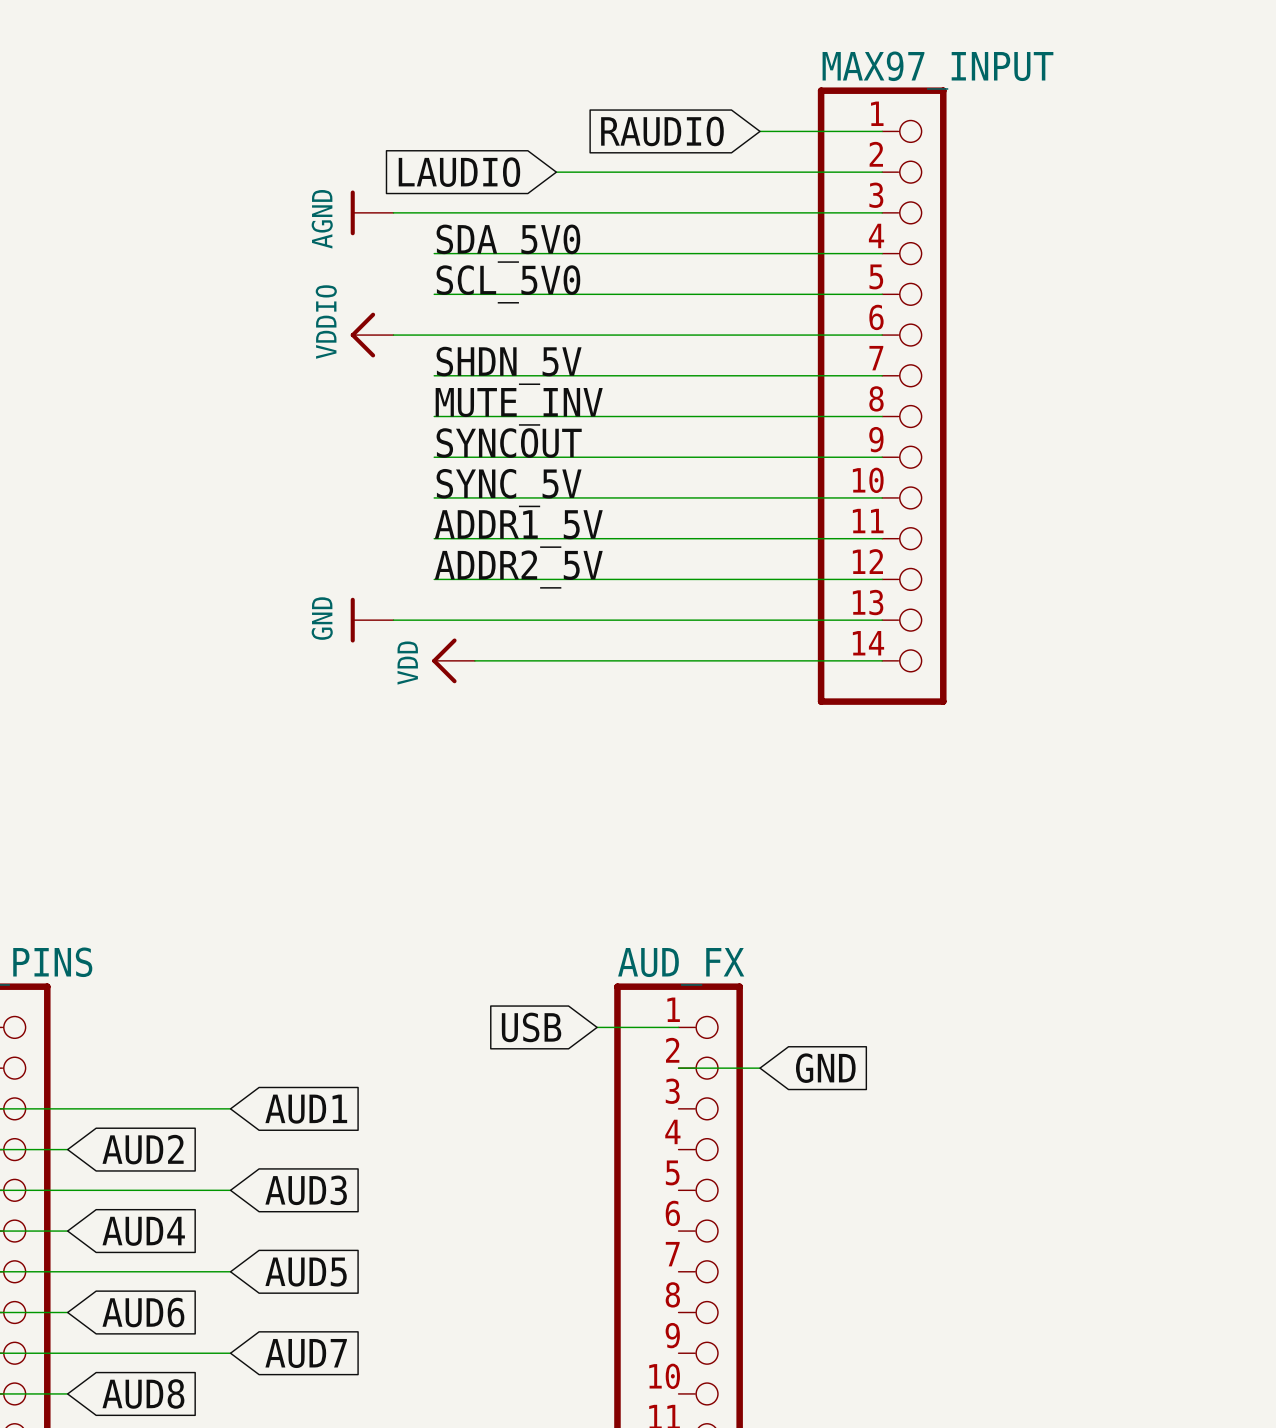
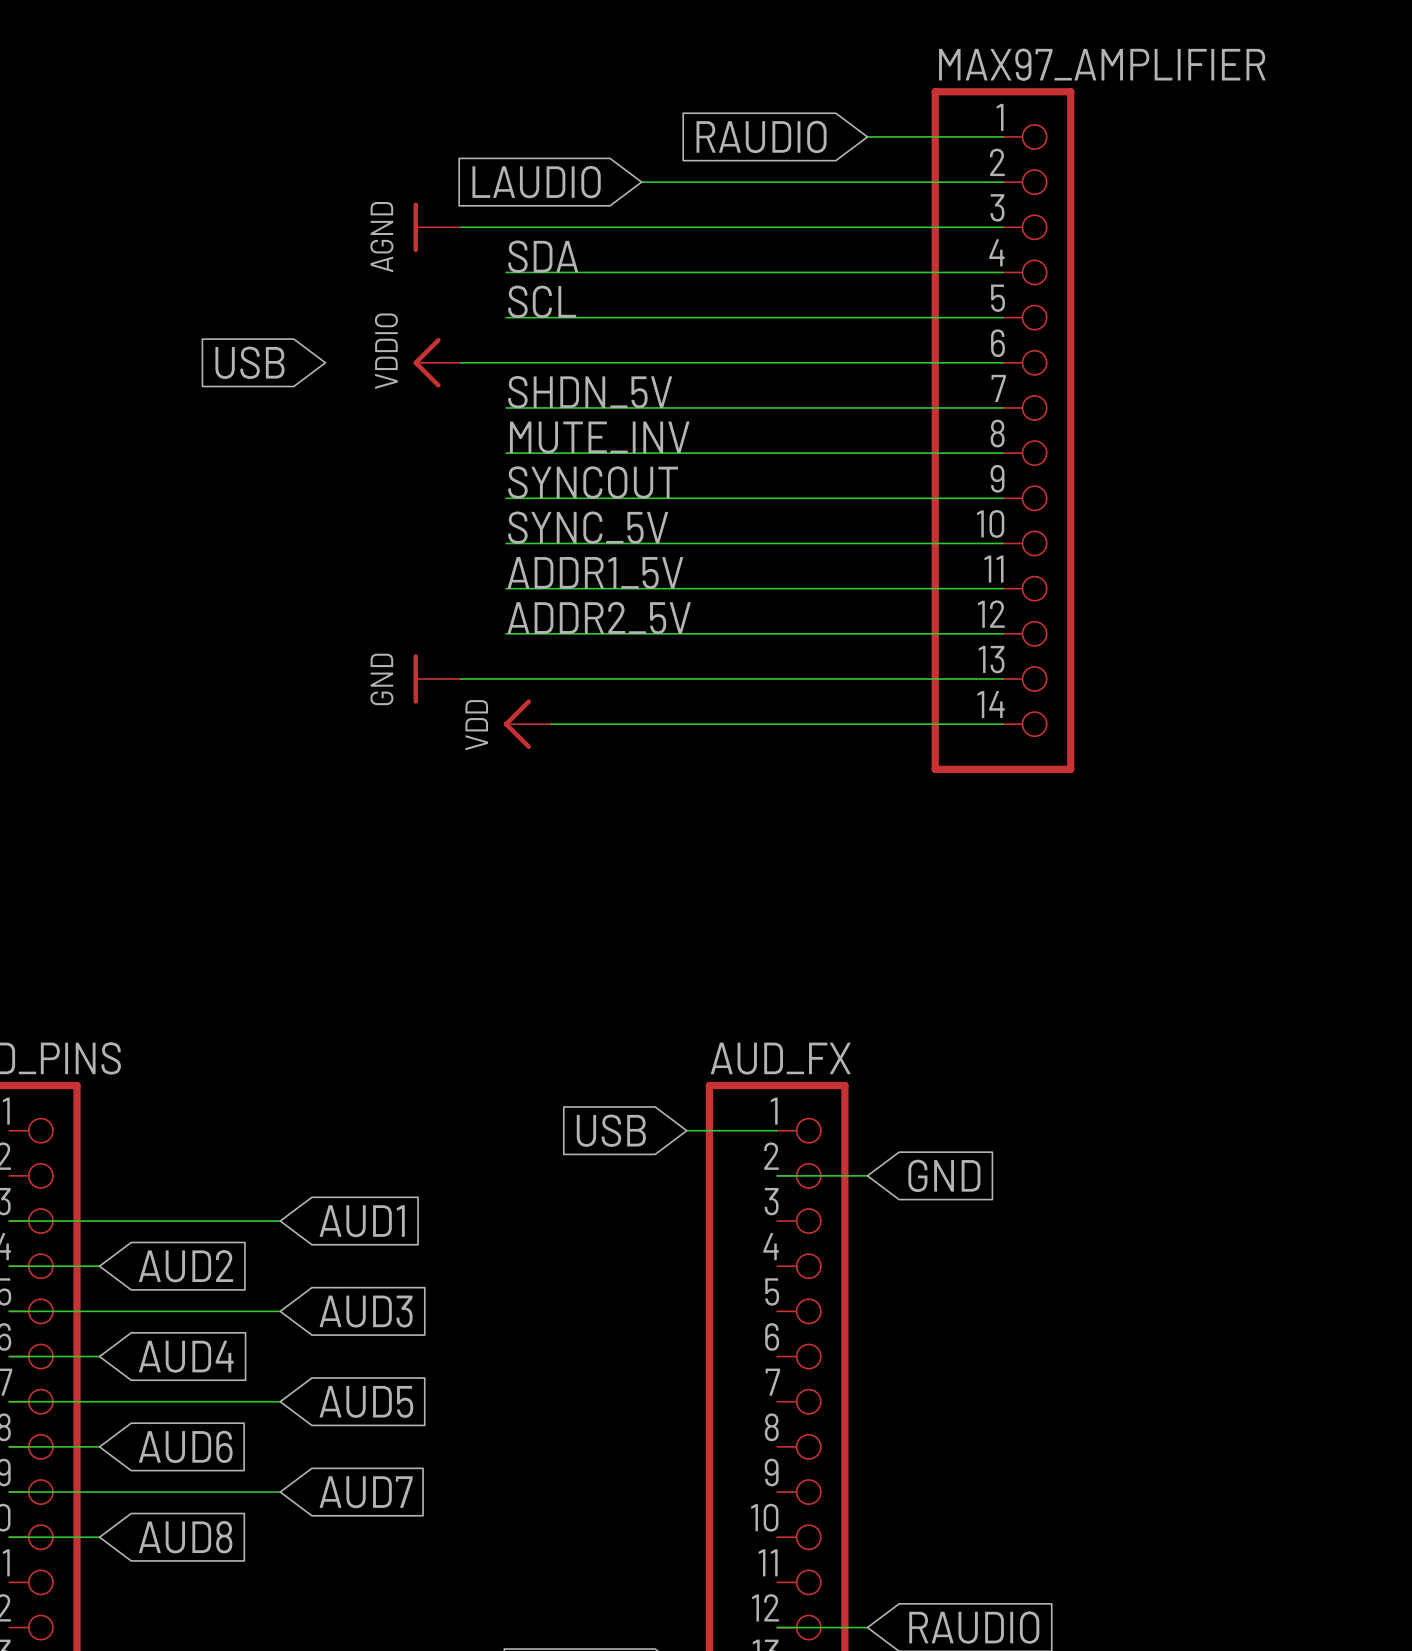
MAX97_INPUT name: MAX97_INPUT (937, 70) -> MAX97_AMPLIFIER (1102, 64)
label: SDA_5V0 (508, 243) -> SDA (543, 256)
label: SCL_5V0 (508, 284) -> SCL (542, 301)
global label: none -> USB (249, 362)

